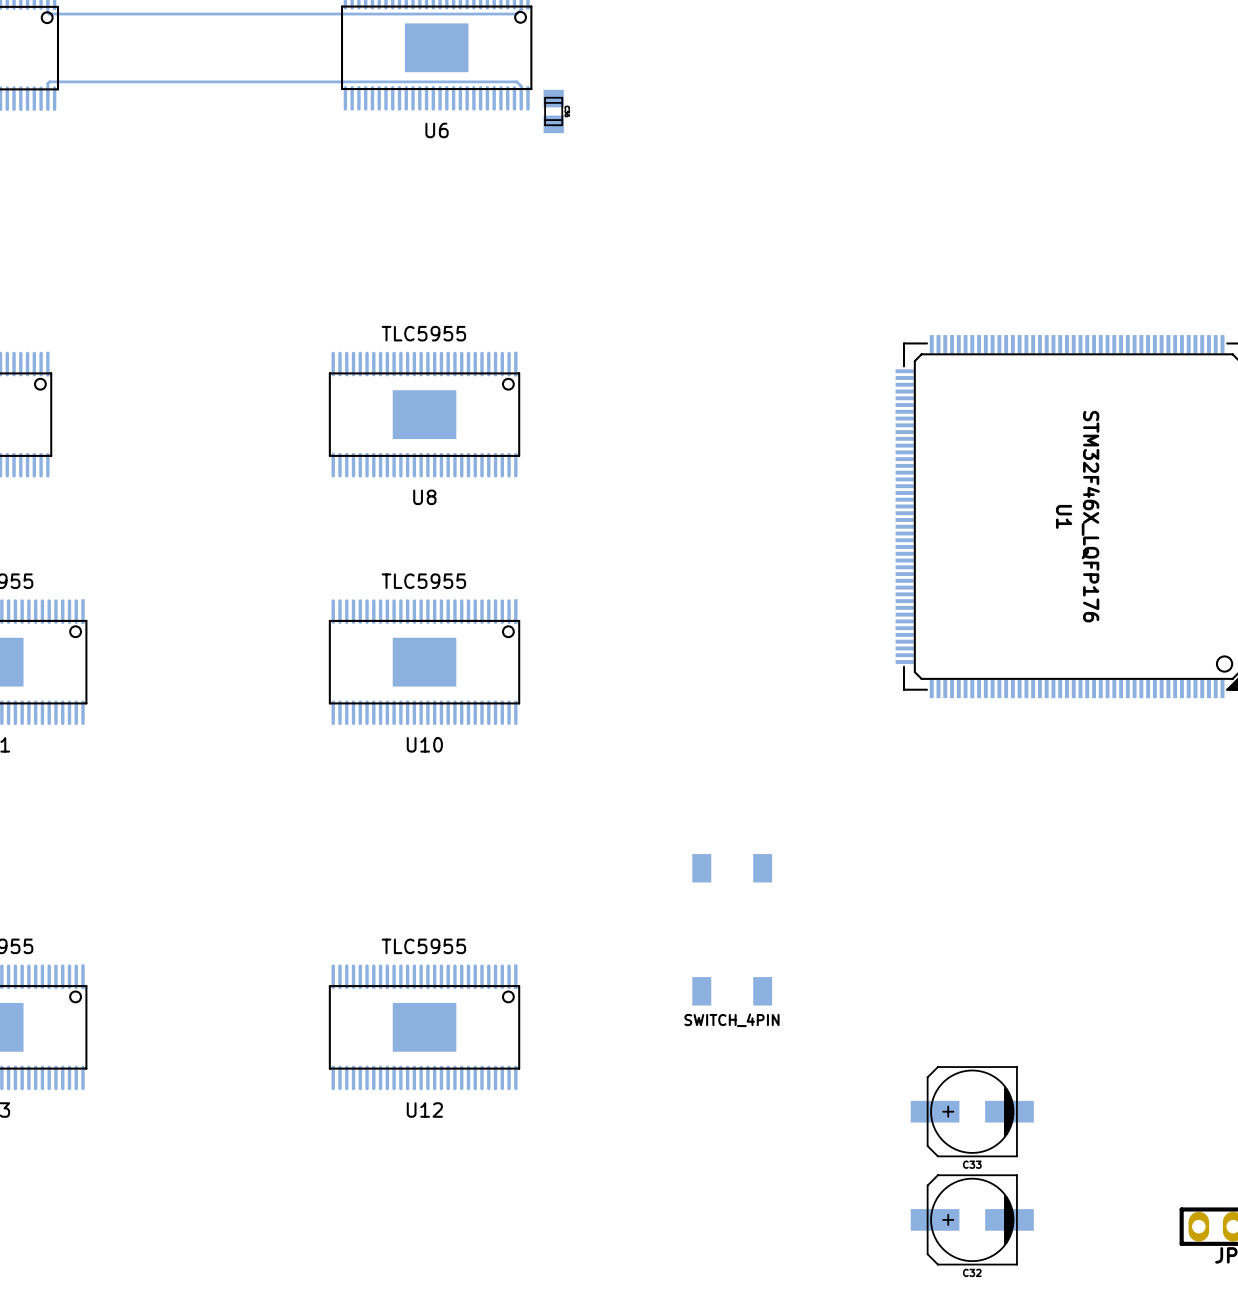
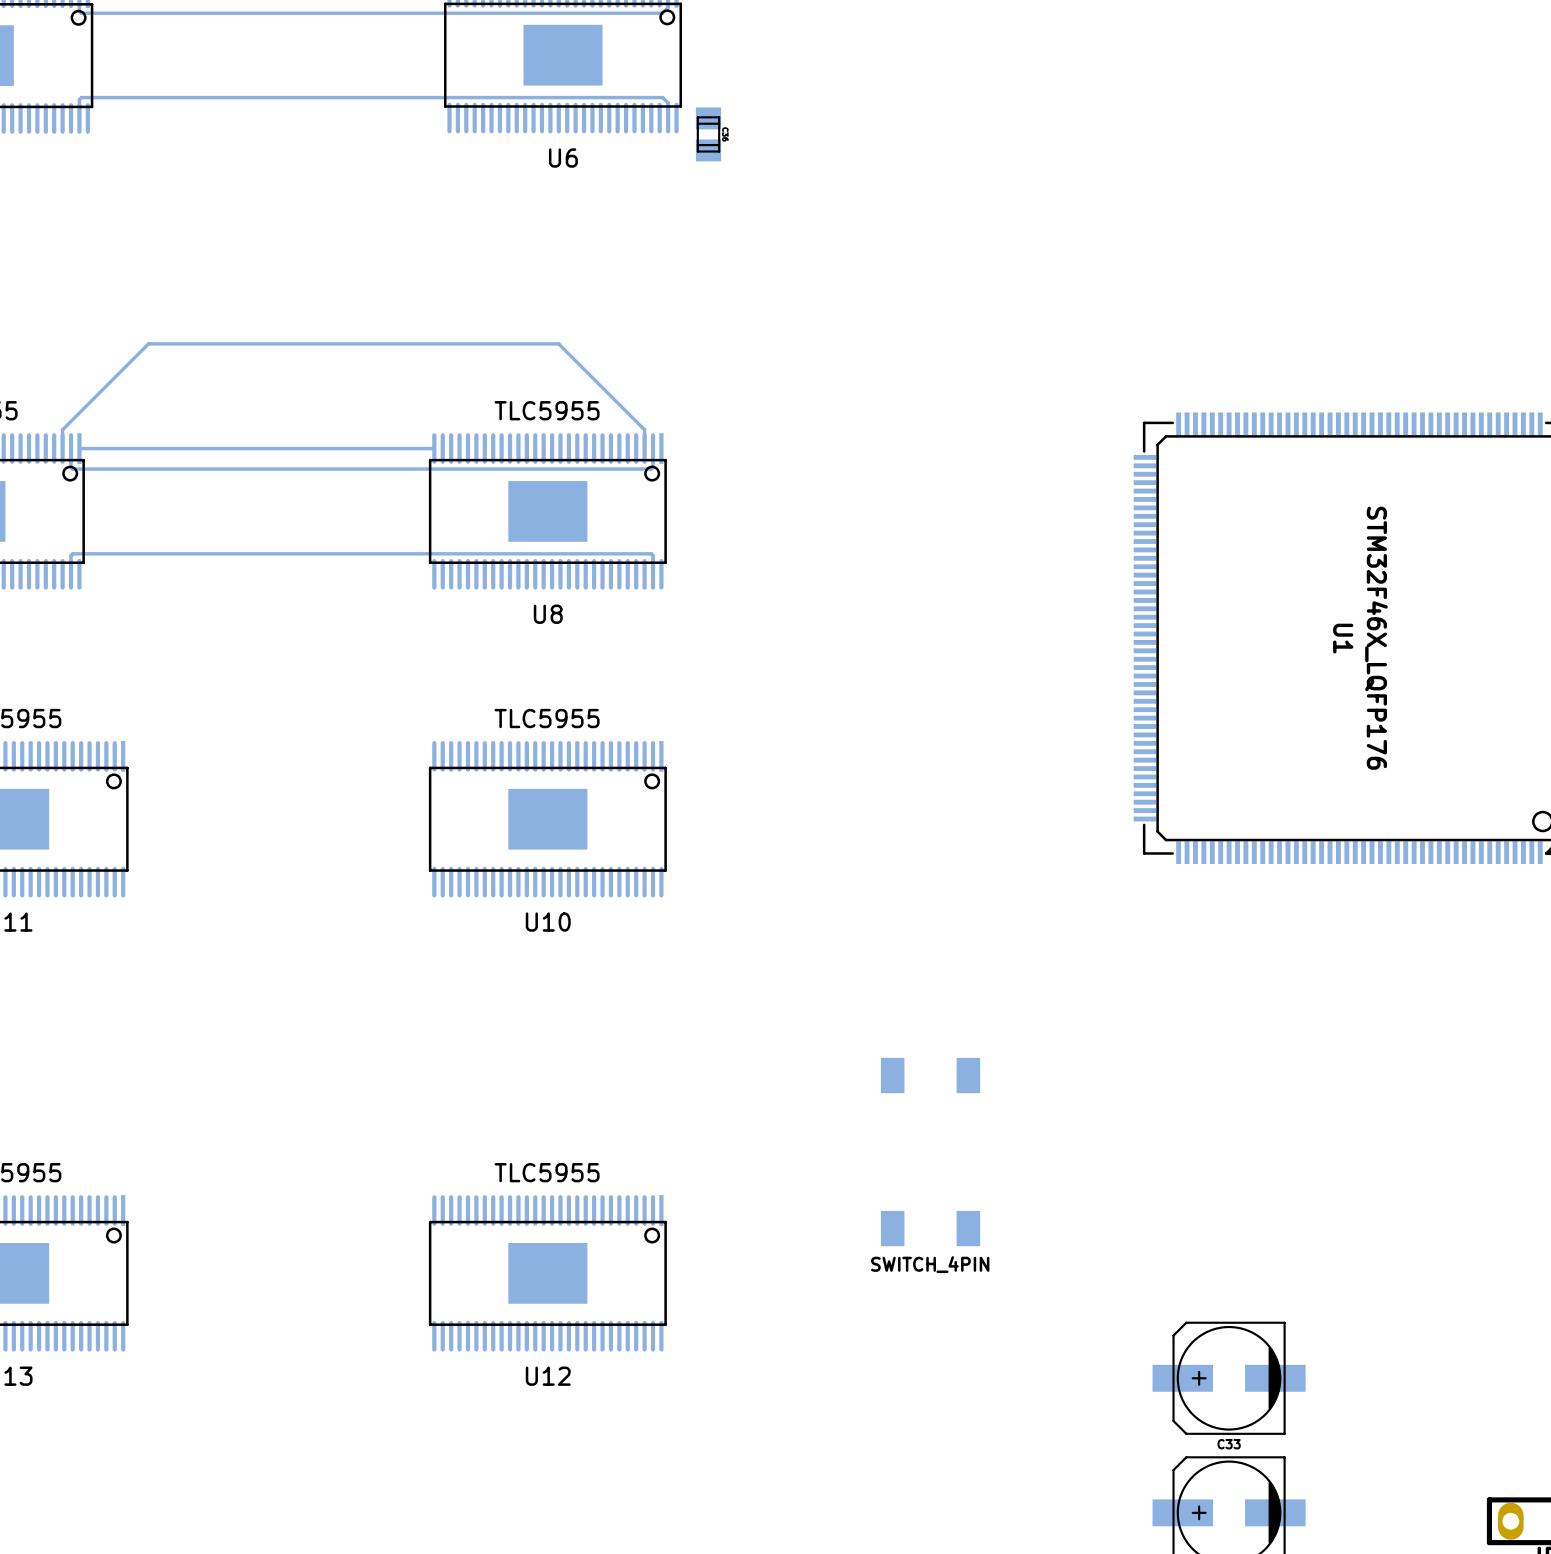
track: none -> (434, 448) (79, 448)
track: none -> (644, 448) (644, 429) (558, 343) (148, 343) (62, 429) (62, 448)
track: none -> (653, 448) (653, 467) (651, 469) (72, 469) (71, 467) (71, 448)
track: none -> (653, 574) (653, 555) (651, 553) (72, 553) (71, 555) (71, 574)

